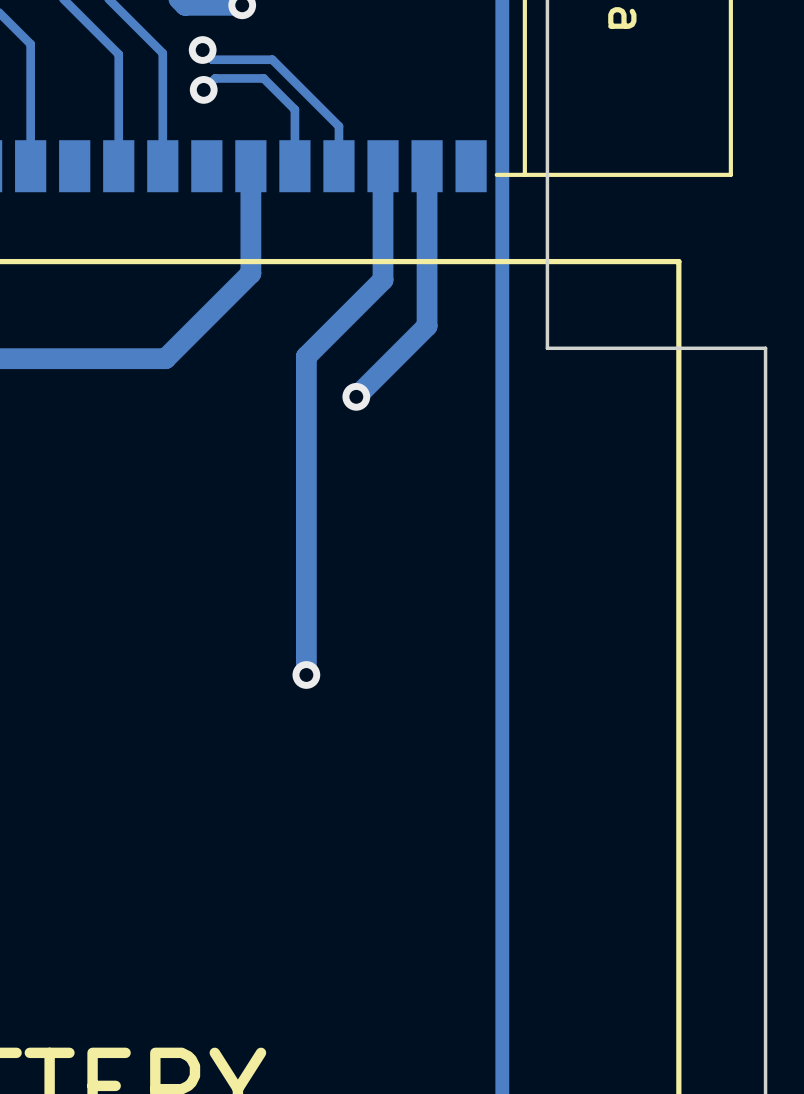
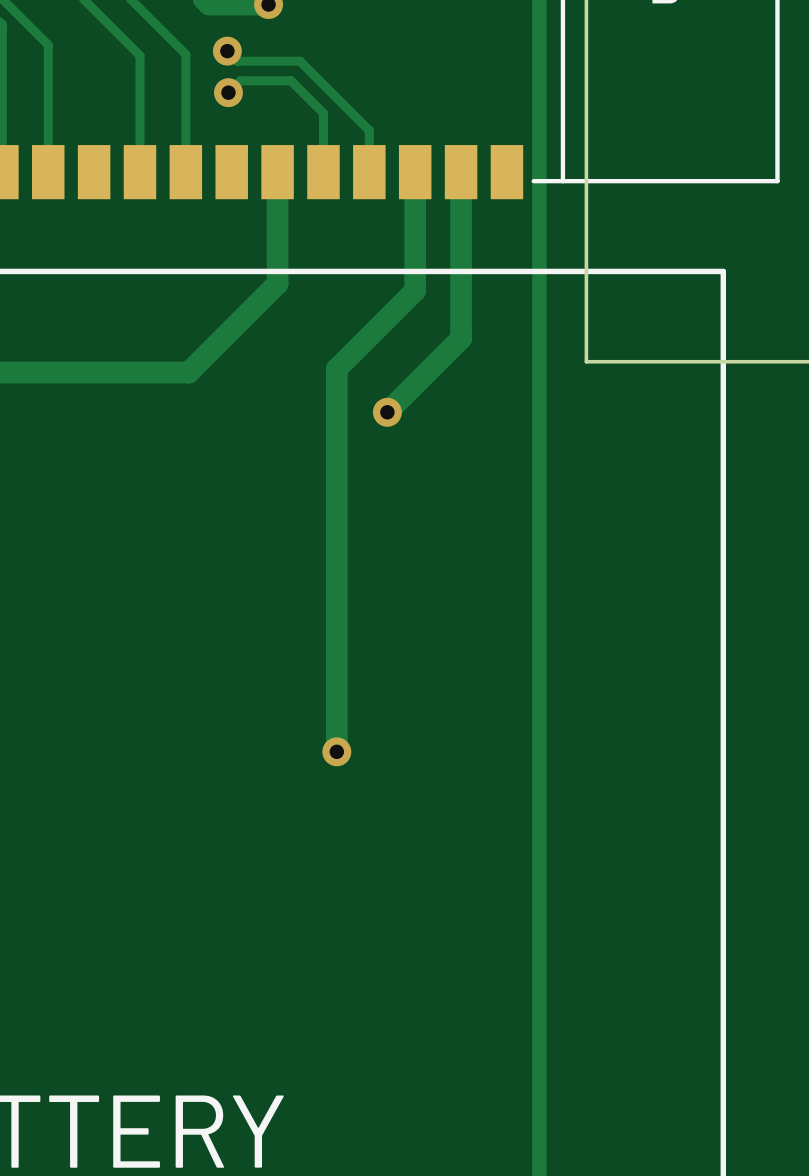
track: (307, 355) (306, 674) -> (336, 368) (336, 751)
via position: (306, 674) -> (336, 751)

